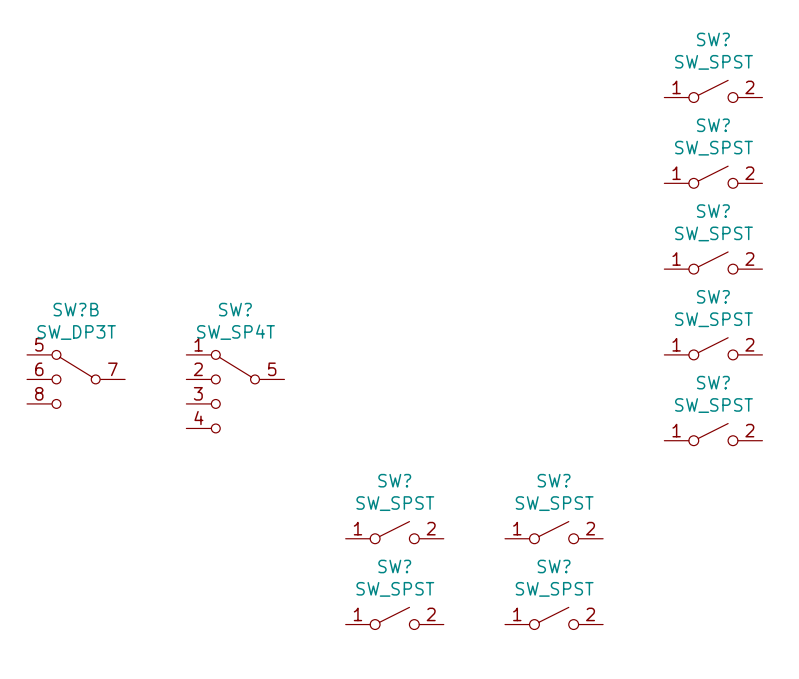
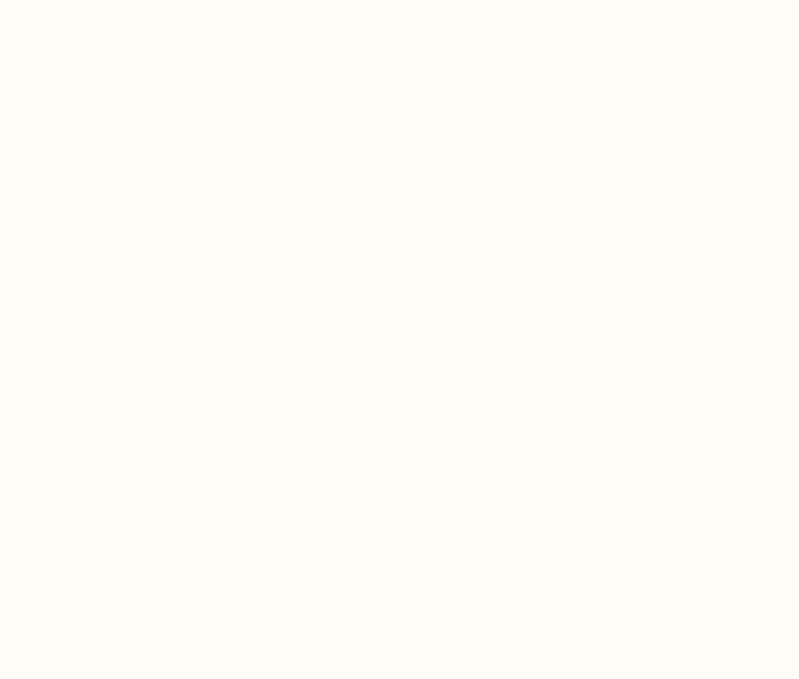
SW?: SW_SPST (713, 91) -> none
SW?: SW_SPST (713, 177) -> none
SW?: SW_SPST (713, 263) -> none
SW?: SW_SPST (713, 348) -> none
SW?B: SW_DP3T (76, 379) -> none
SW?: SW_SP4T (235, 391) -> none
SW?: SW_SPST (713, 434) -> none
SW?: SW_SPST (394, 532) -> none
SW?: SW_SPST (554, 532) -> none
SW?: SW_SPST (394, 618) -> none
SW?: SW_SPST (554, 618) -> none

